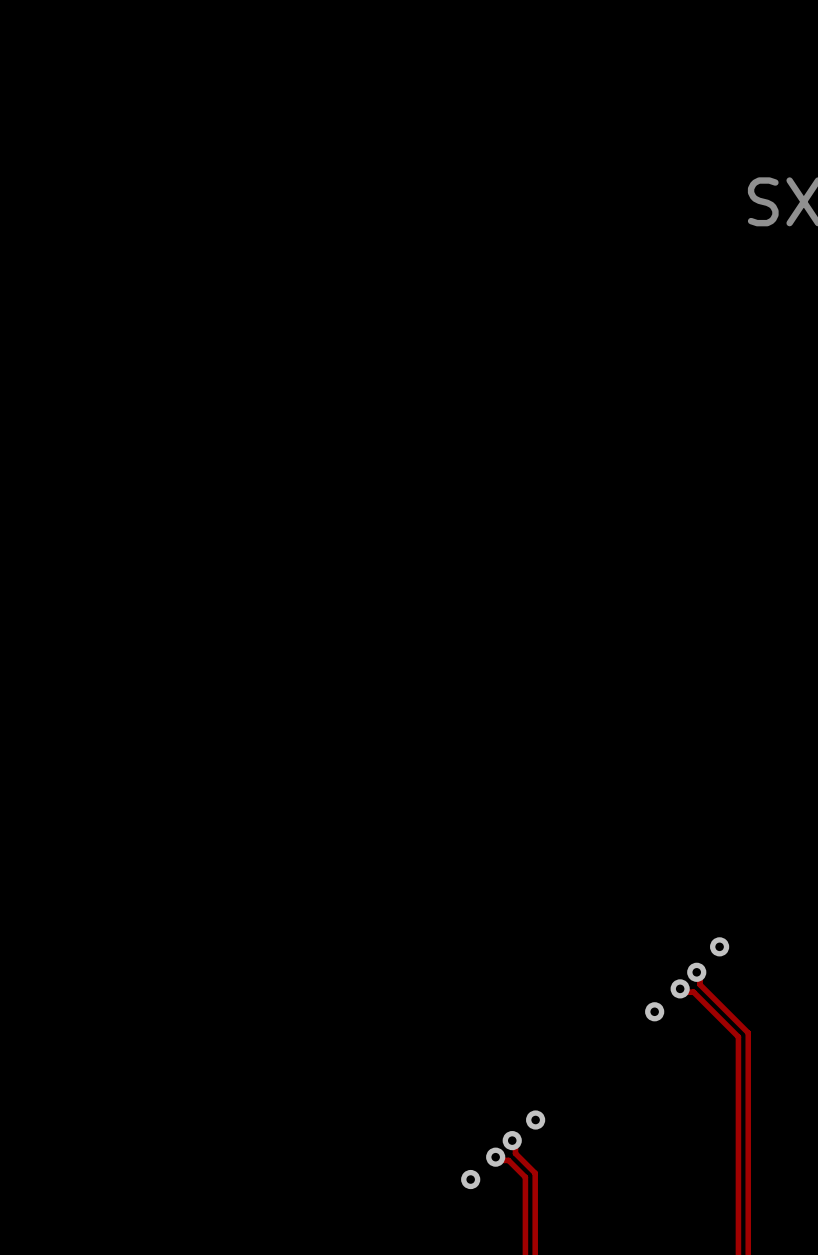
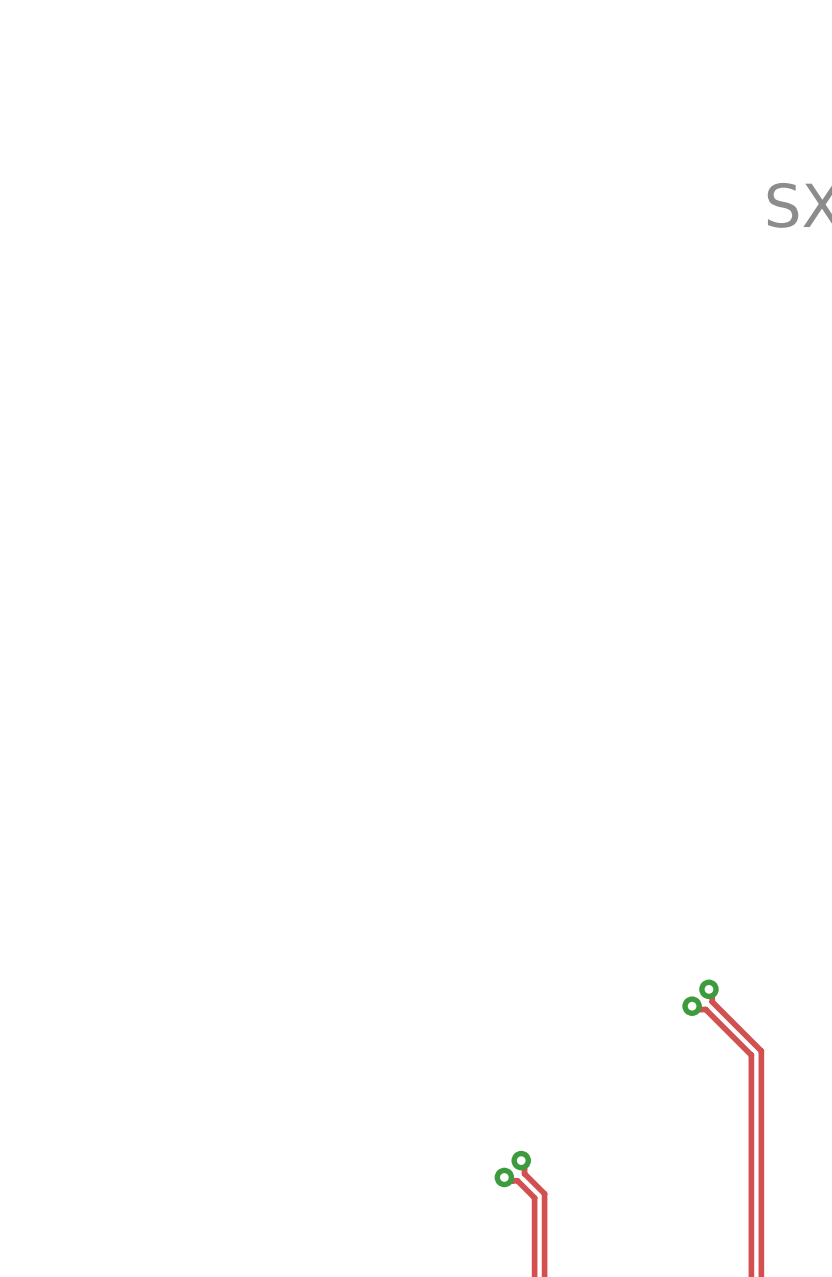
via: (719, 946) -> none
via: (654, 1011) -> none
via: (535, 1120) -> none
via: (470, 1179) -> none

